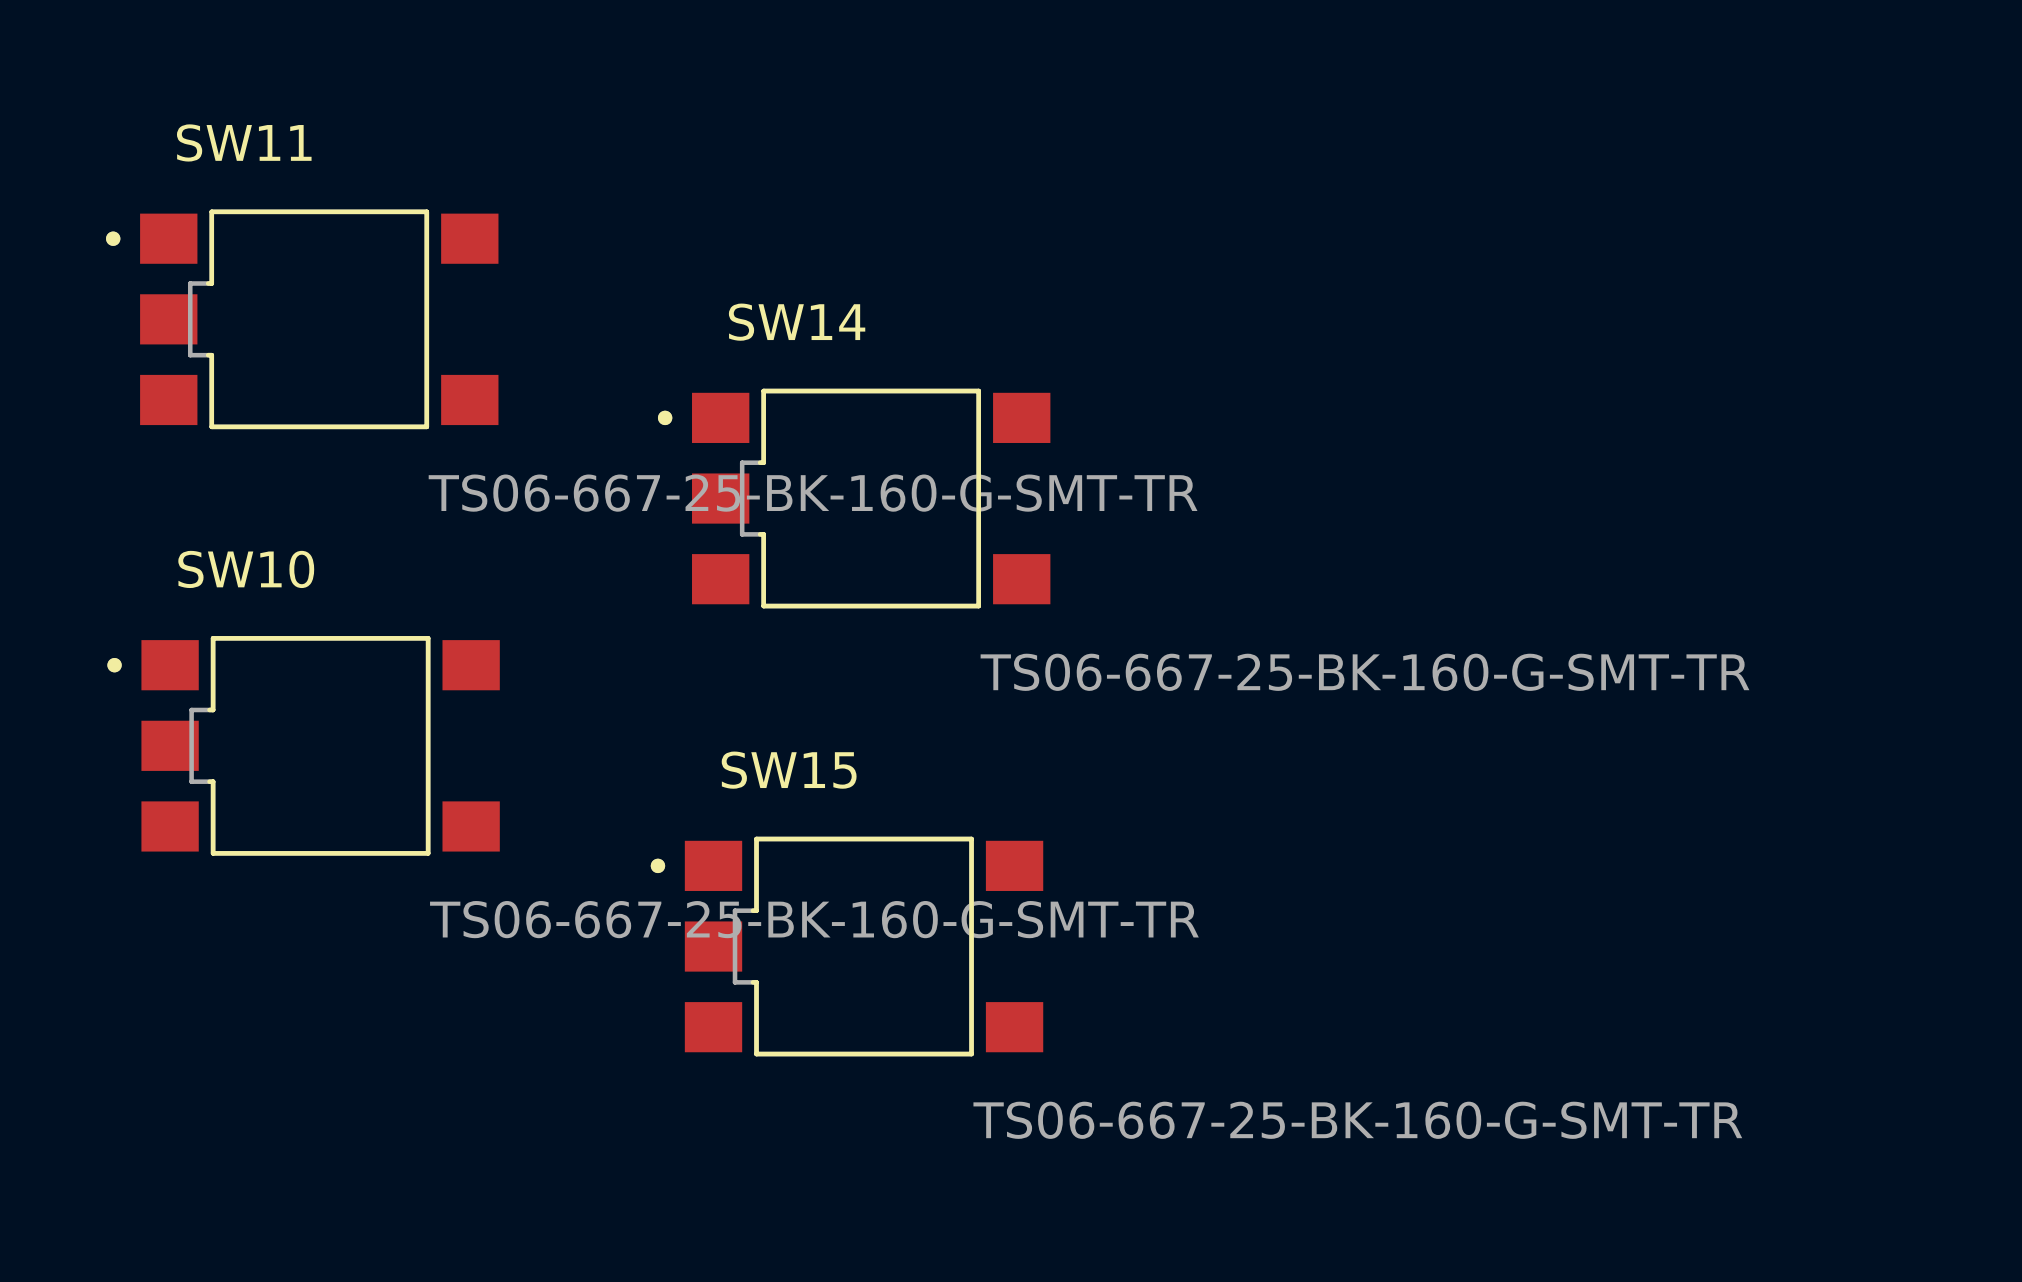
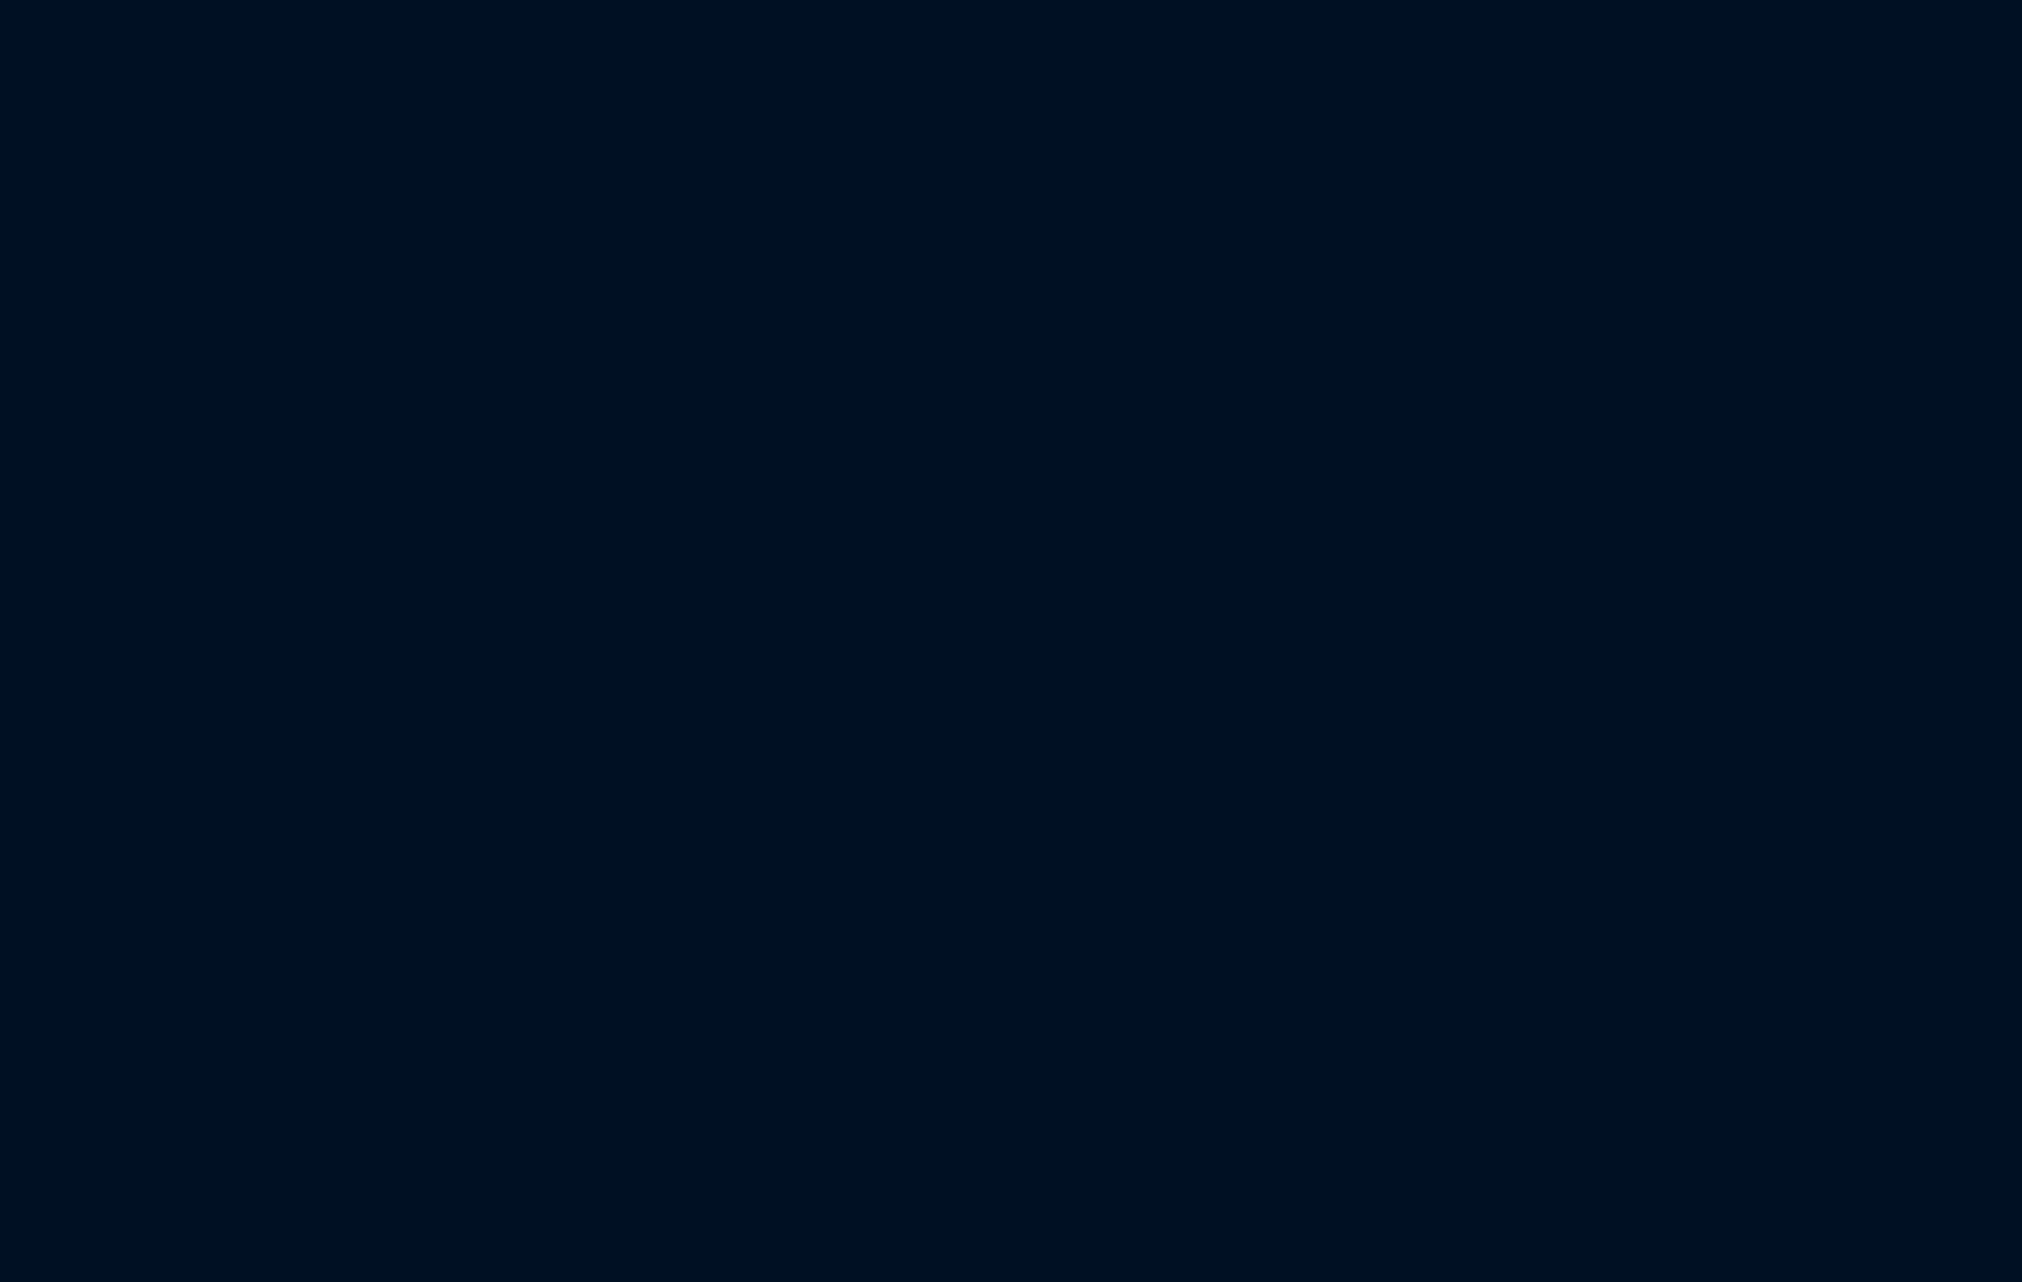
SW11: TS06-667-25-BK-160-G-SMT-TR (302, 319) -> none
SW14: TS06-667-25-BK-160-G-SMT-TR (854, 498) -> none
SW10: TS06-667-25-BK-160-G-SMT-TR (303, 745) -> none
SW15: TS06-667-25-BK-160-G-SMT-TR (847, 946) -> none

